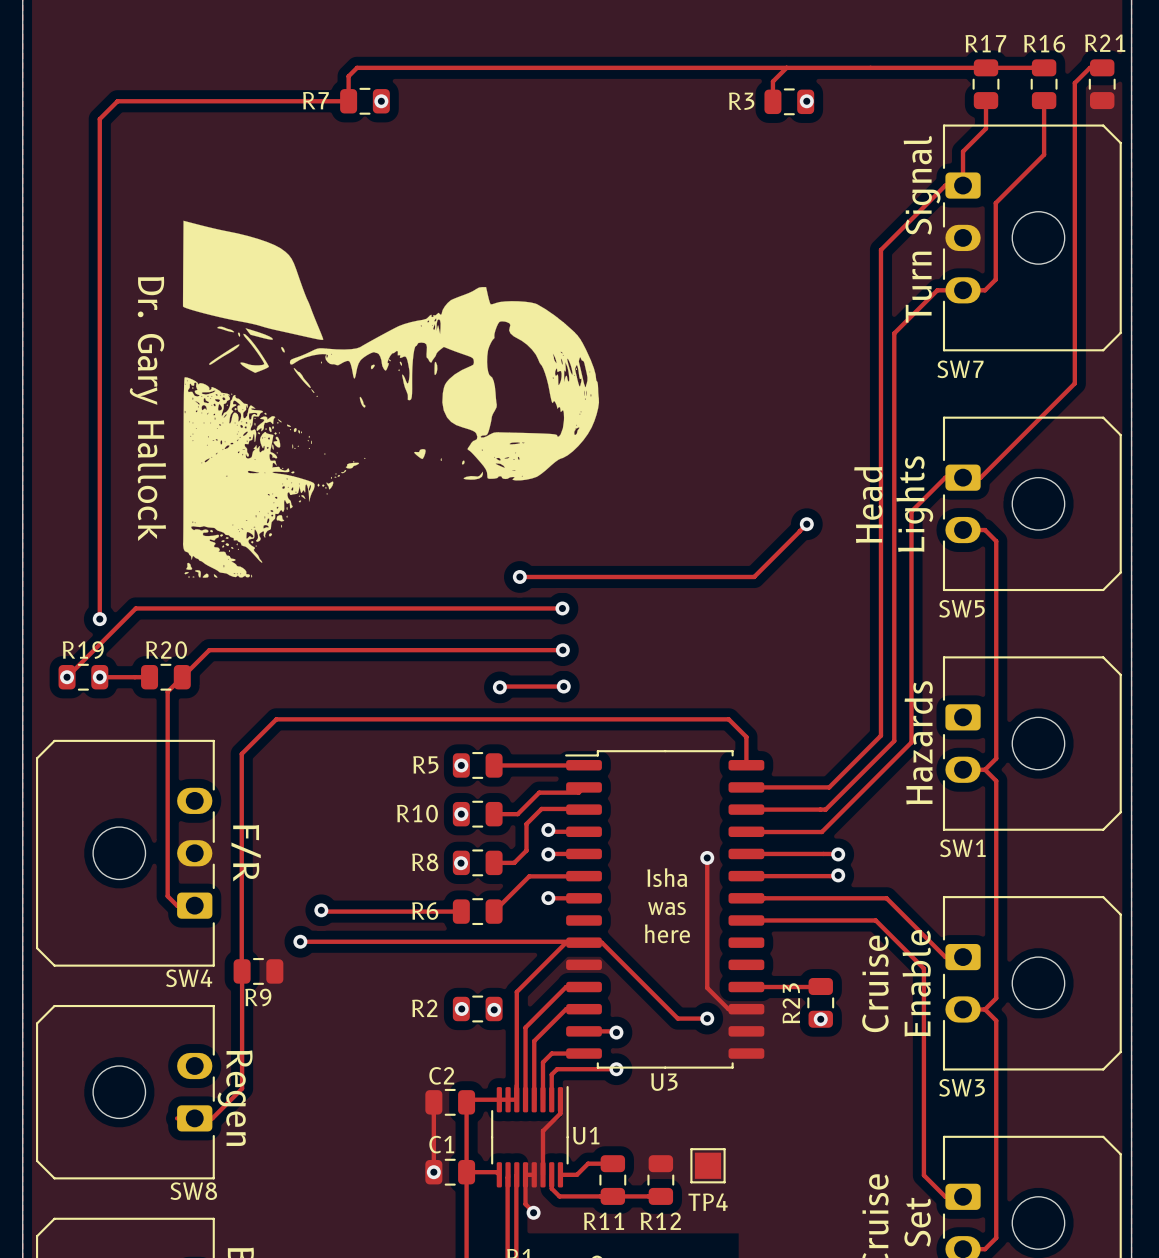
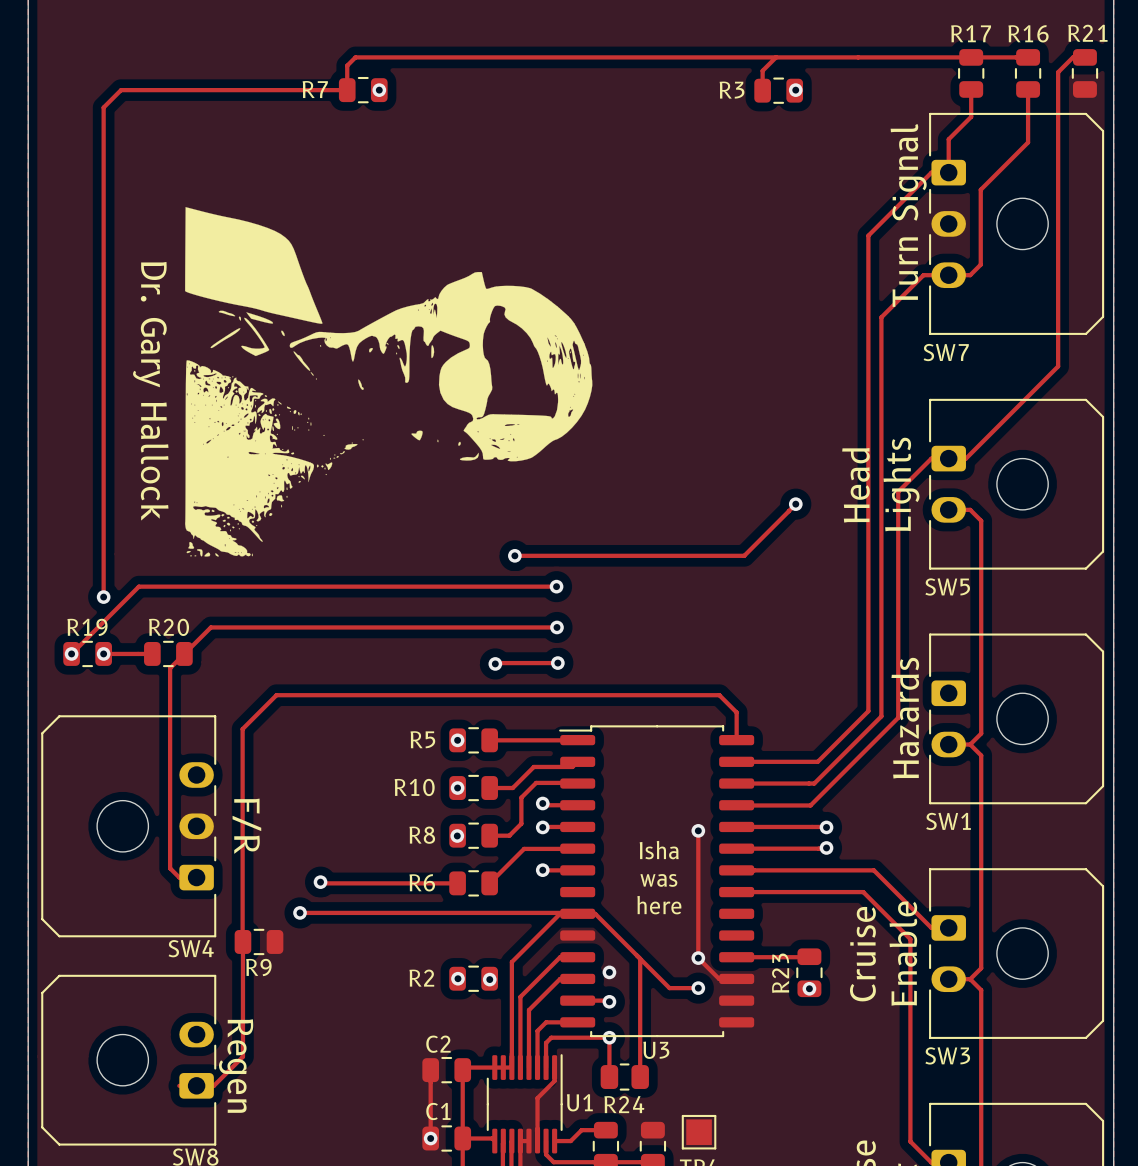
via: none -> (698, 958)
track: none -> (640, 958) (640, 1077)
via: none -> (609, 972)
track: none -> (609, 1037) (609, 1077)
R24: none -> (624, 1077)

